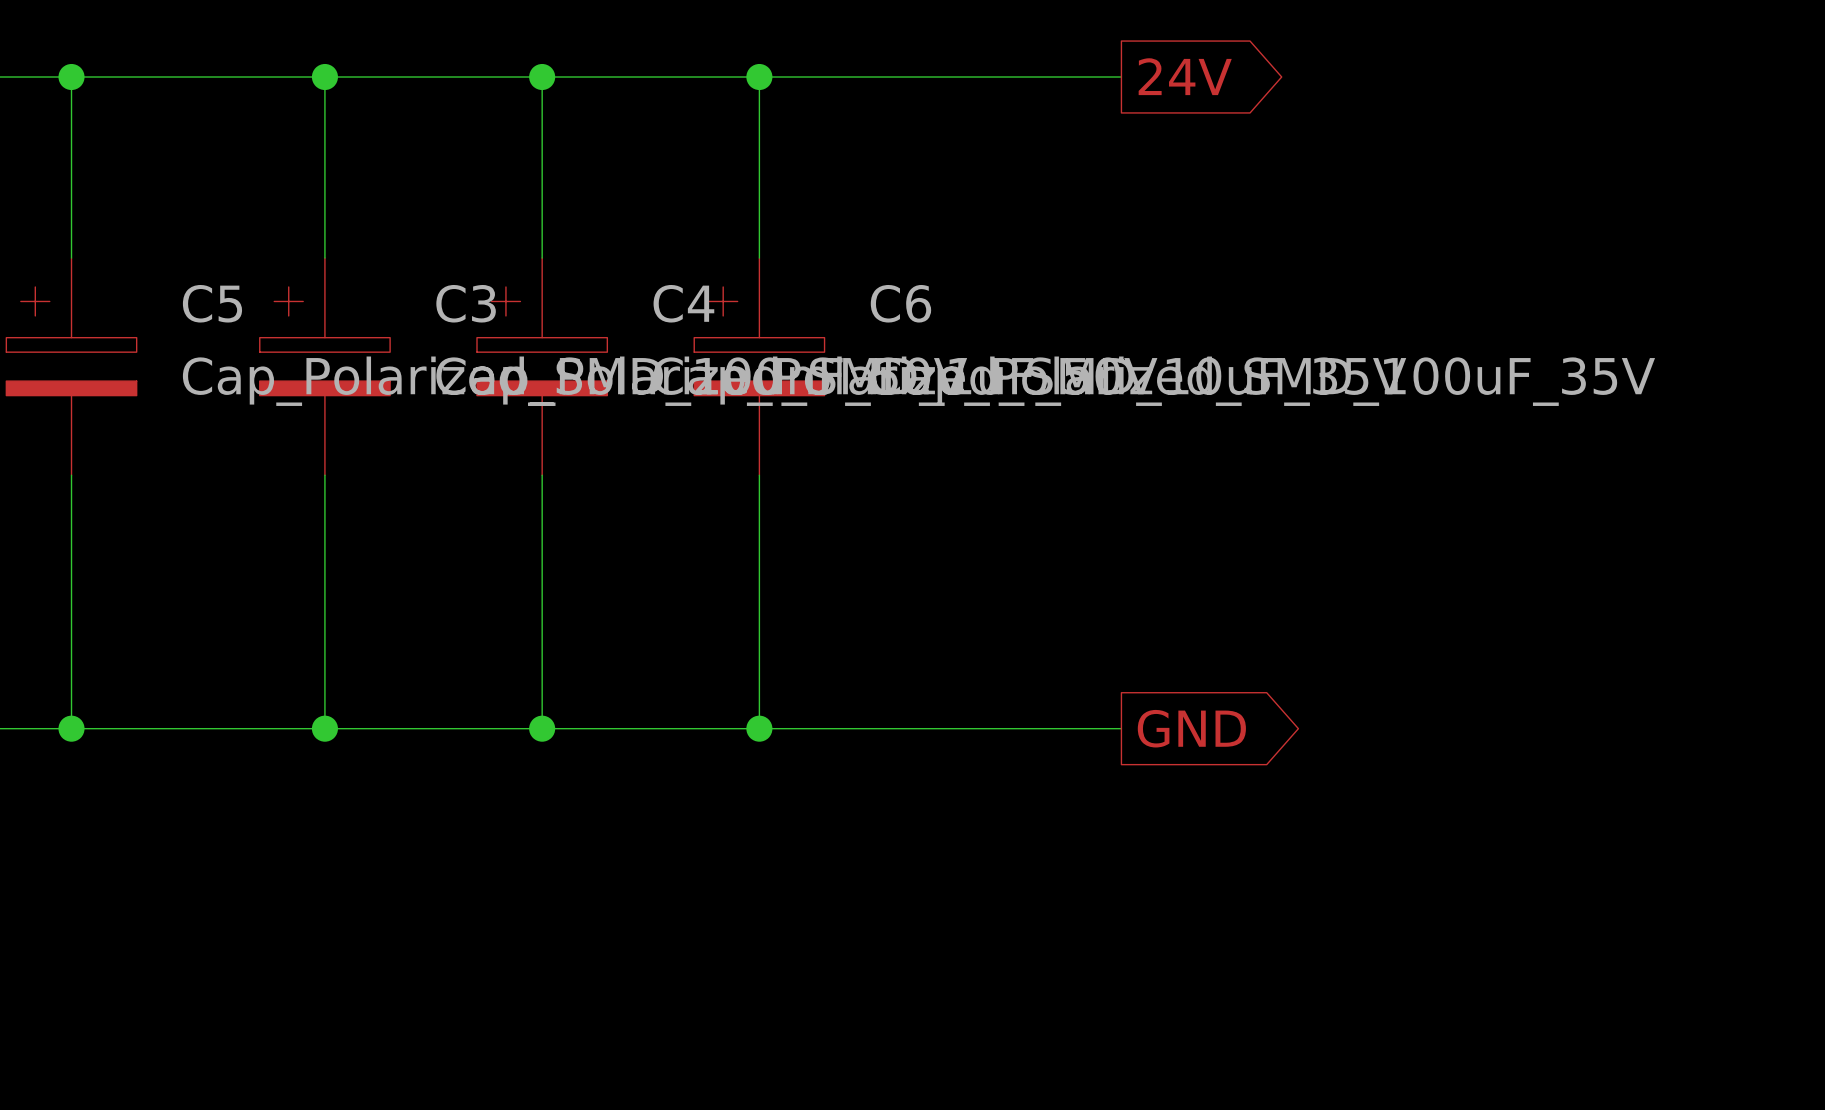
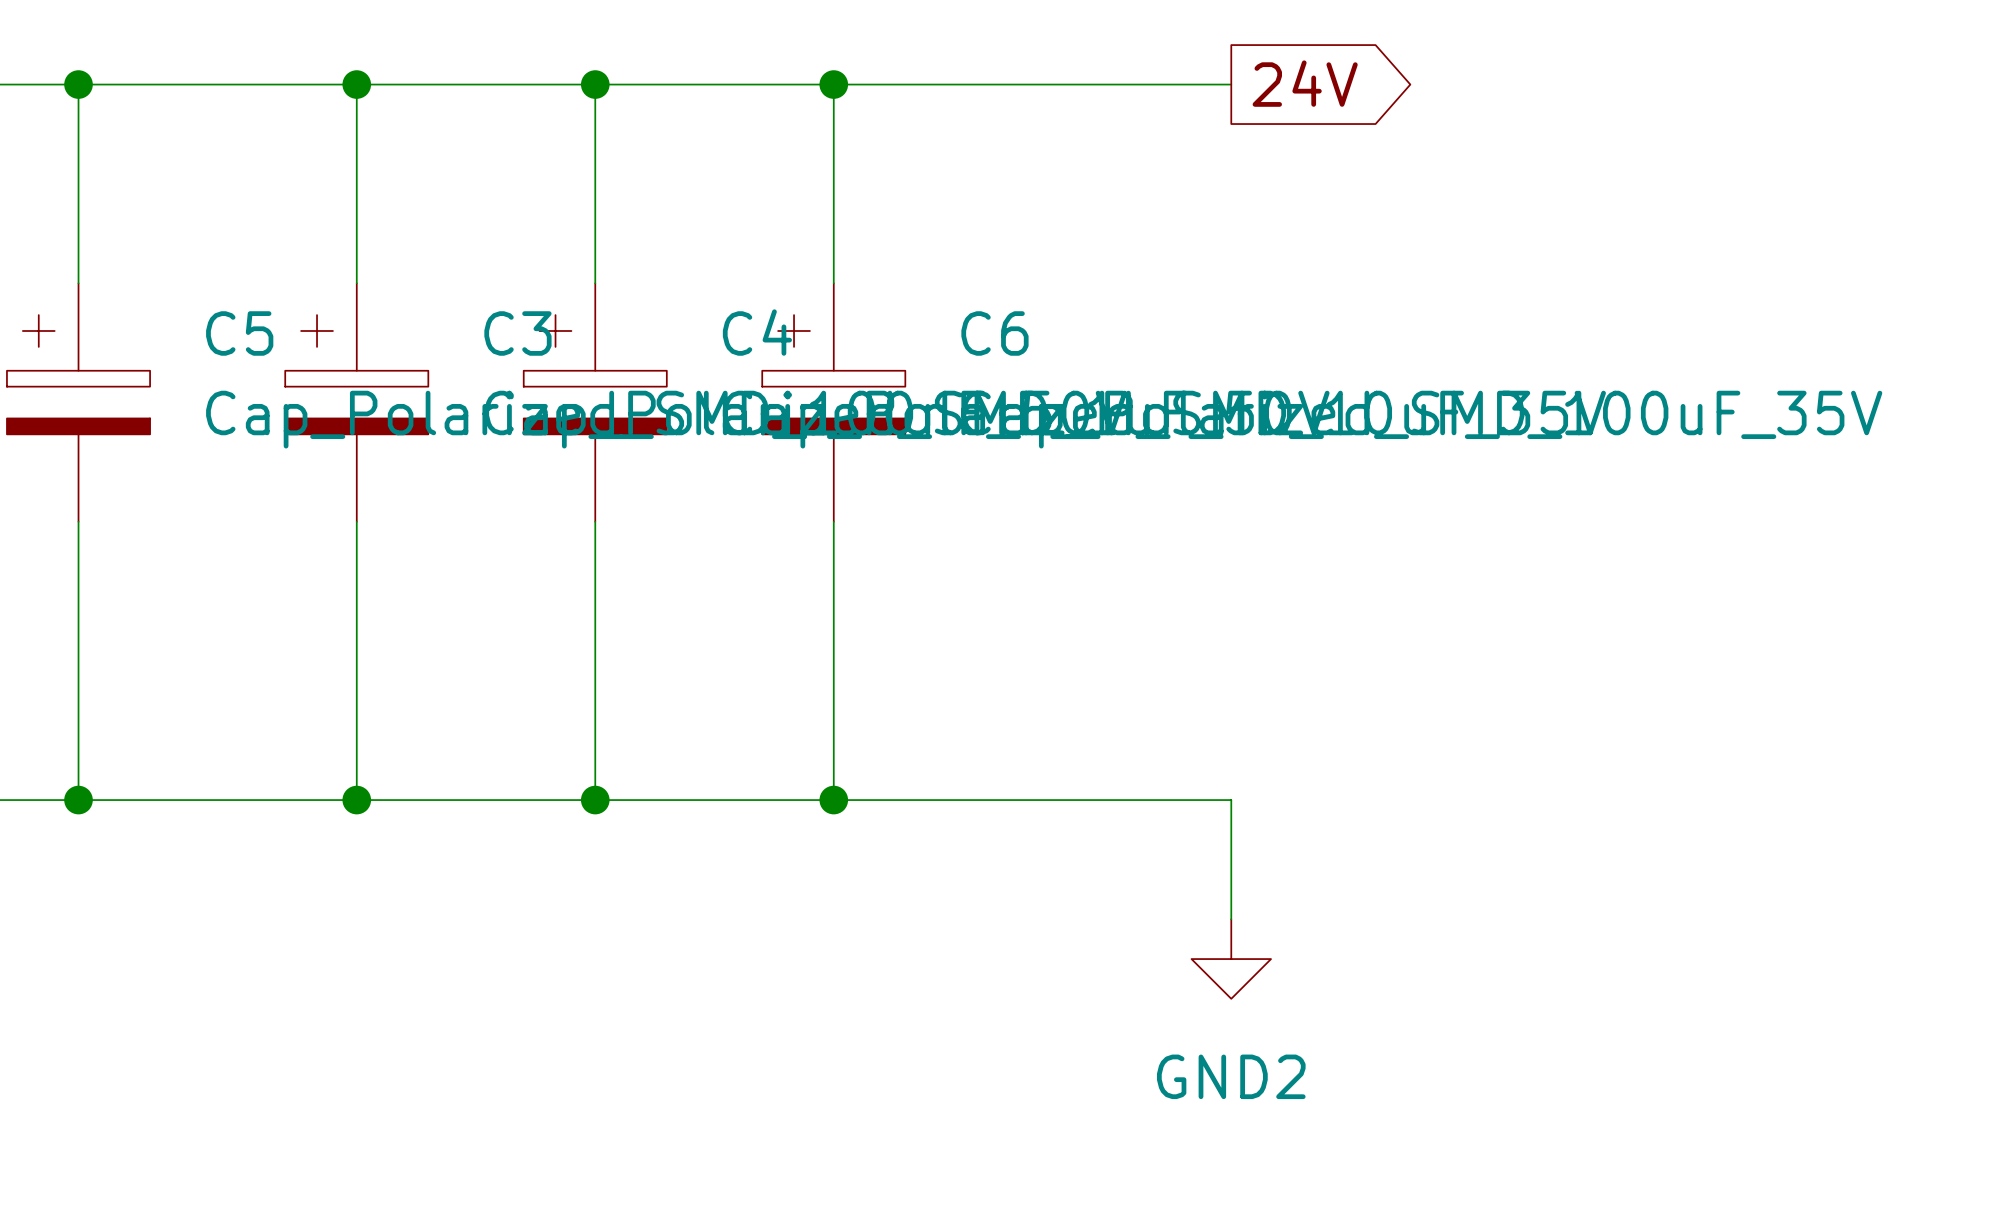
wire: none -> (1231, 800) (1231, 919)
global label: GND (1191, 728) -> none
power symbol: none -> GND2 (1231, 959)

